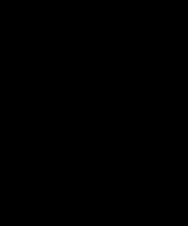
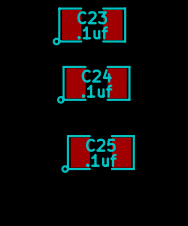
C23: none -> .1uf (89, 26)
C24: none -> .1uf (93, 84)
C25: none -> .1uf (98, 153)

